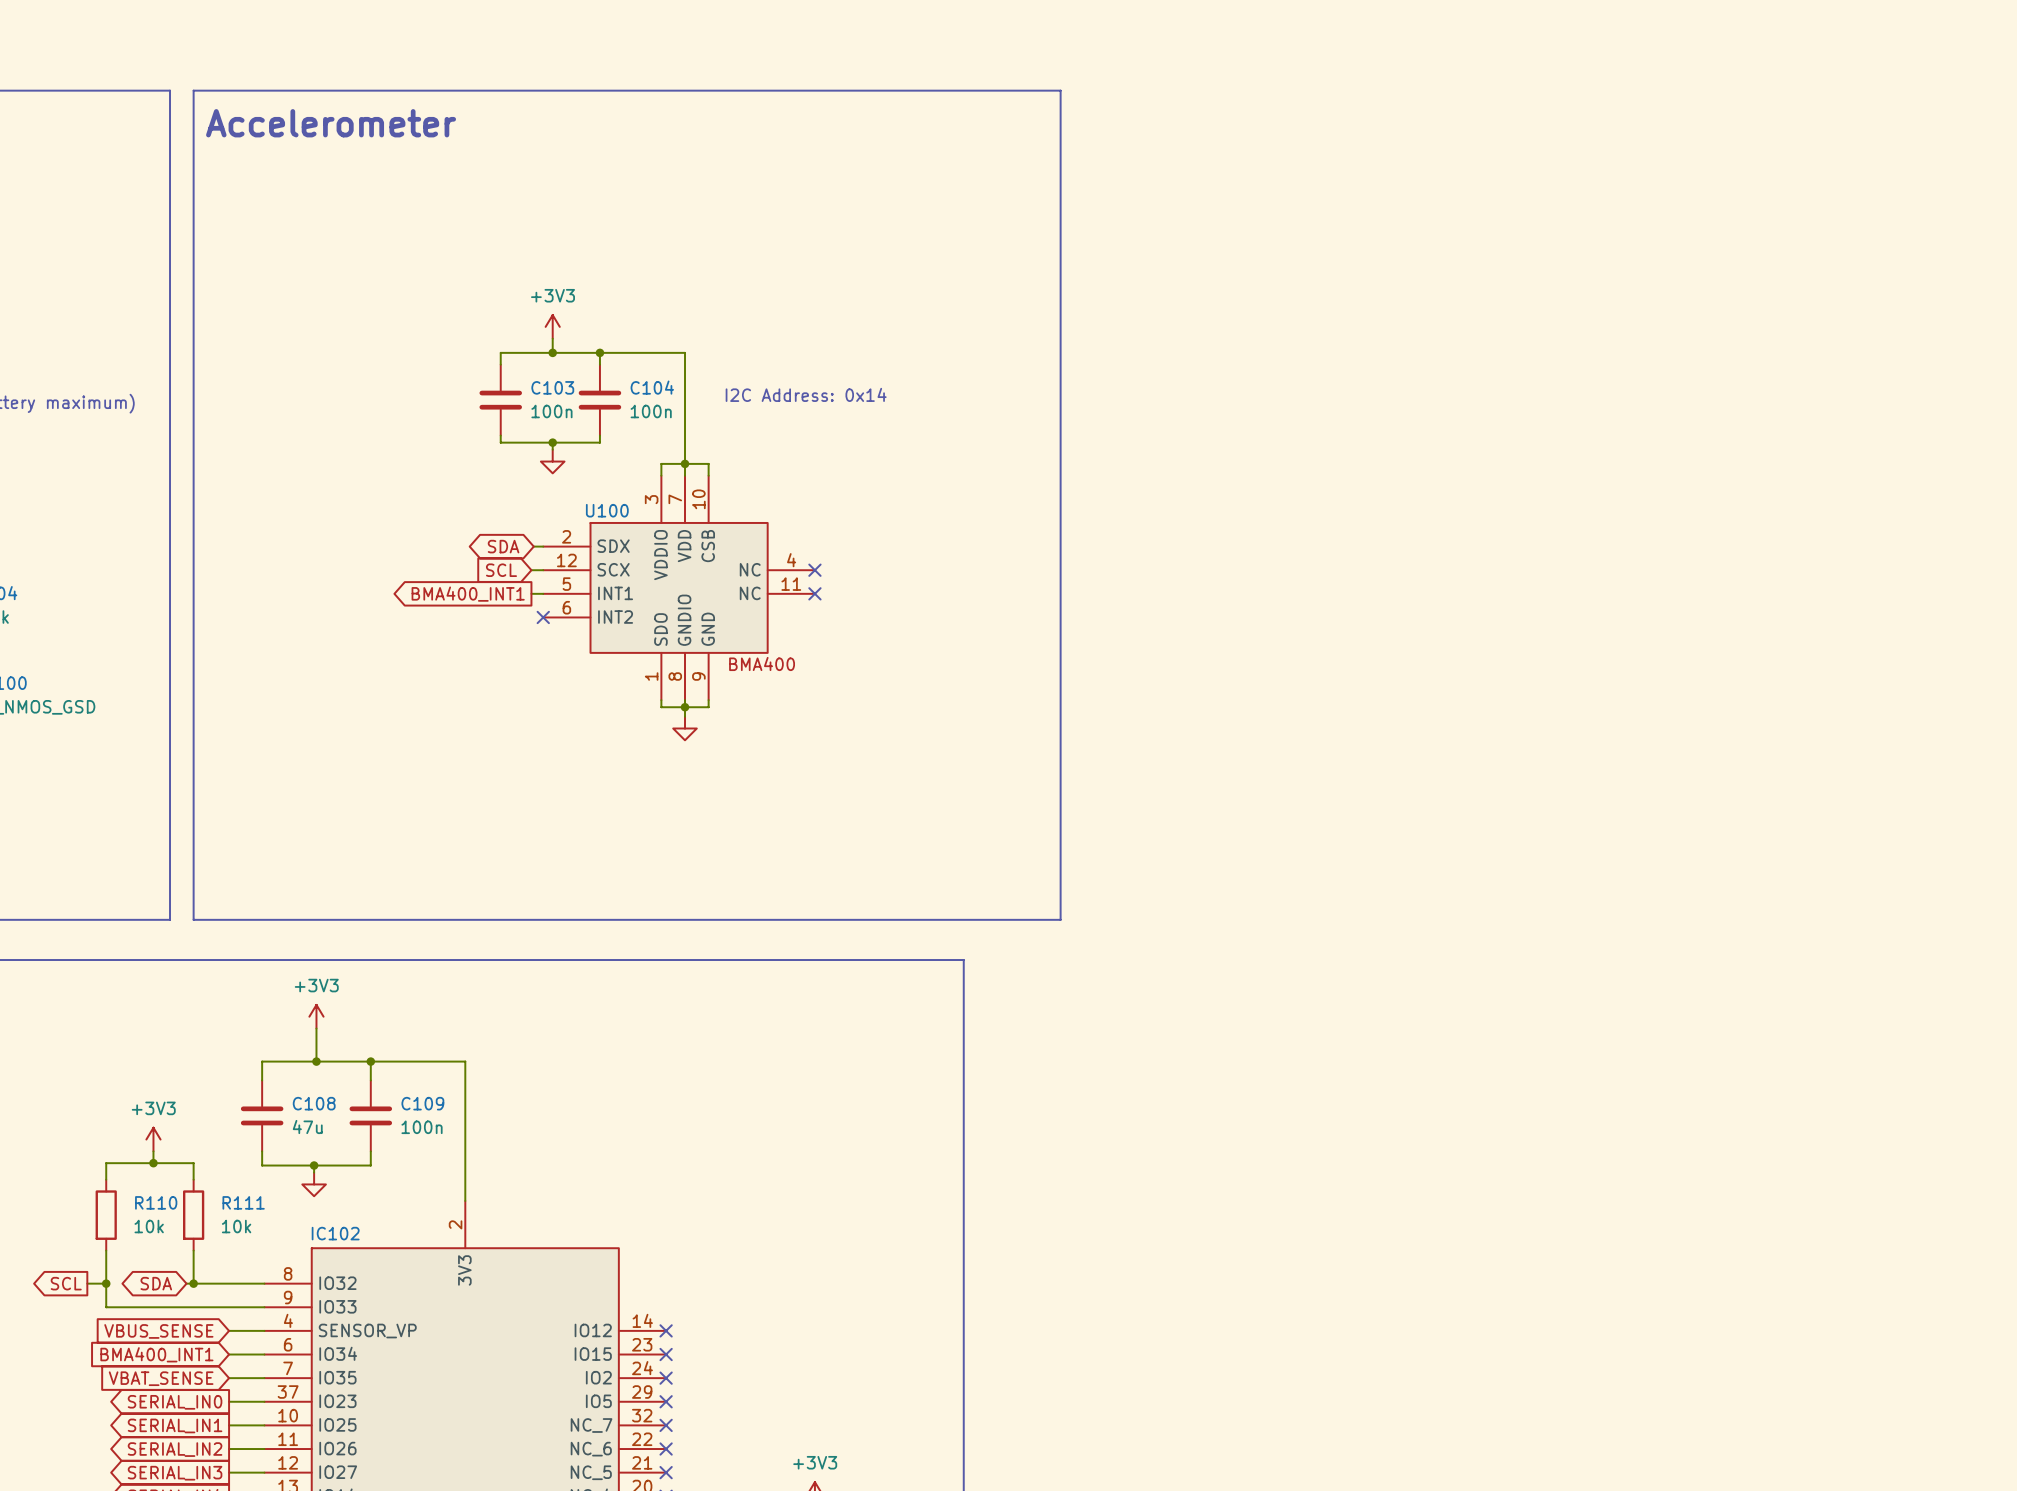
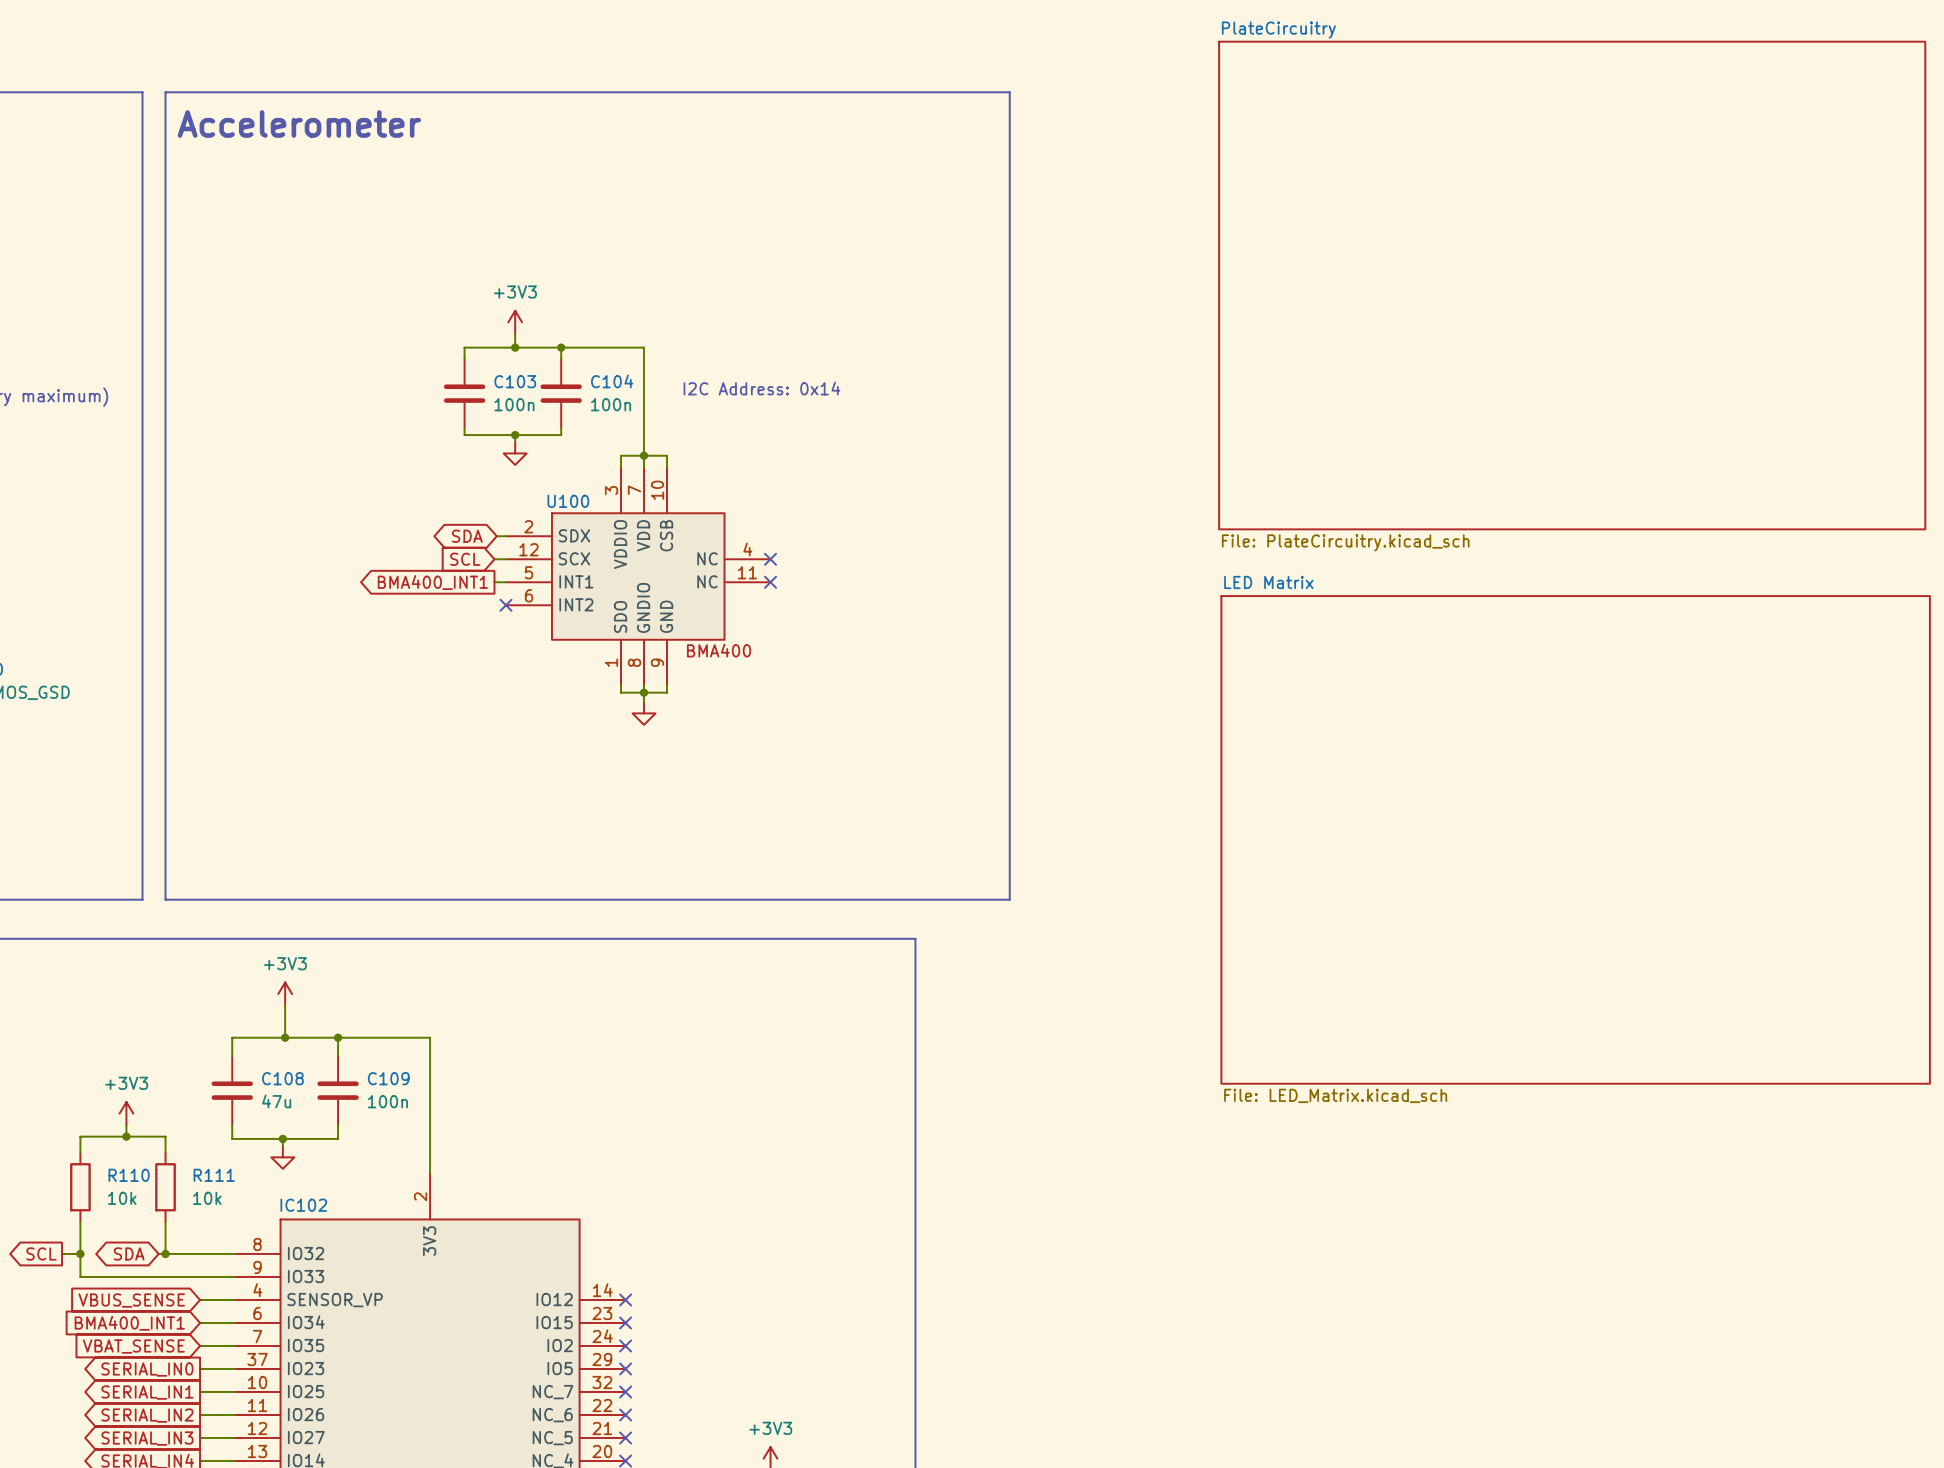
sheet PlateCircuitry: none -> File: PlateCircuitry.kicad_sch (1572, 285)
sheet LED Matrix: none -> File: LED_Matrix.kicad_sch (1575, 839)

